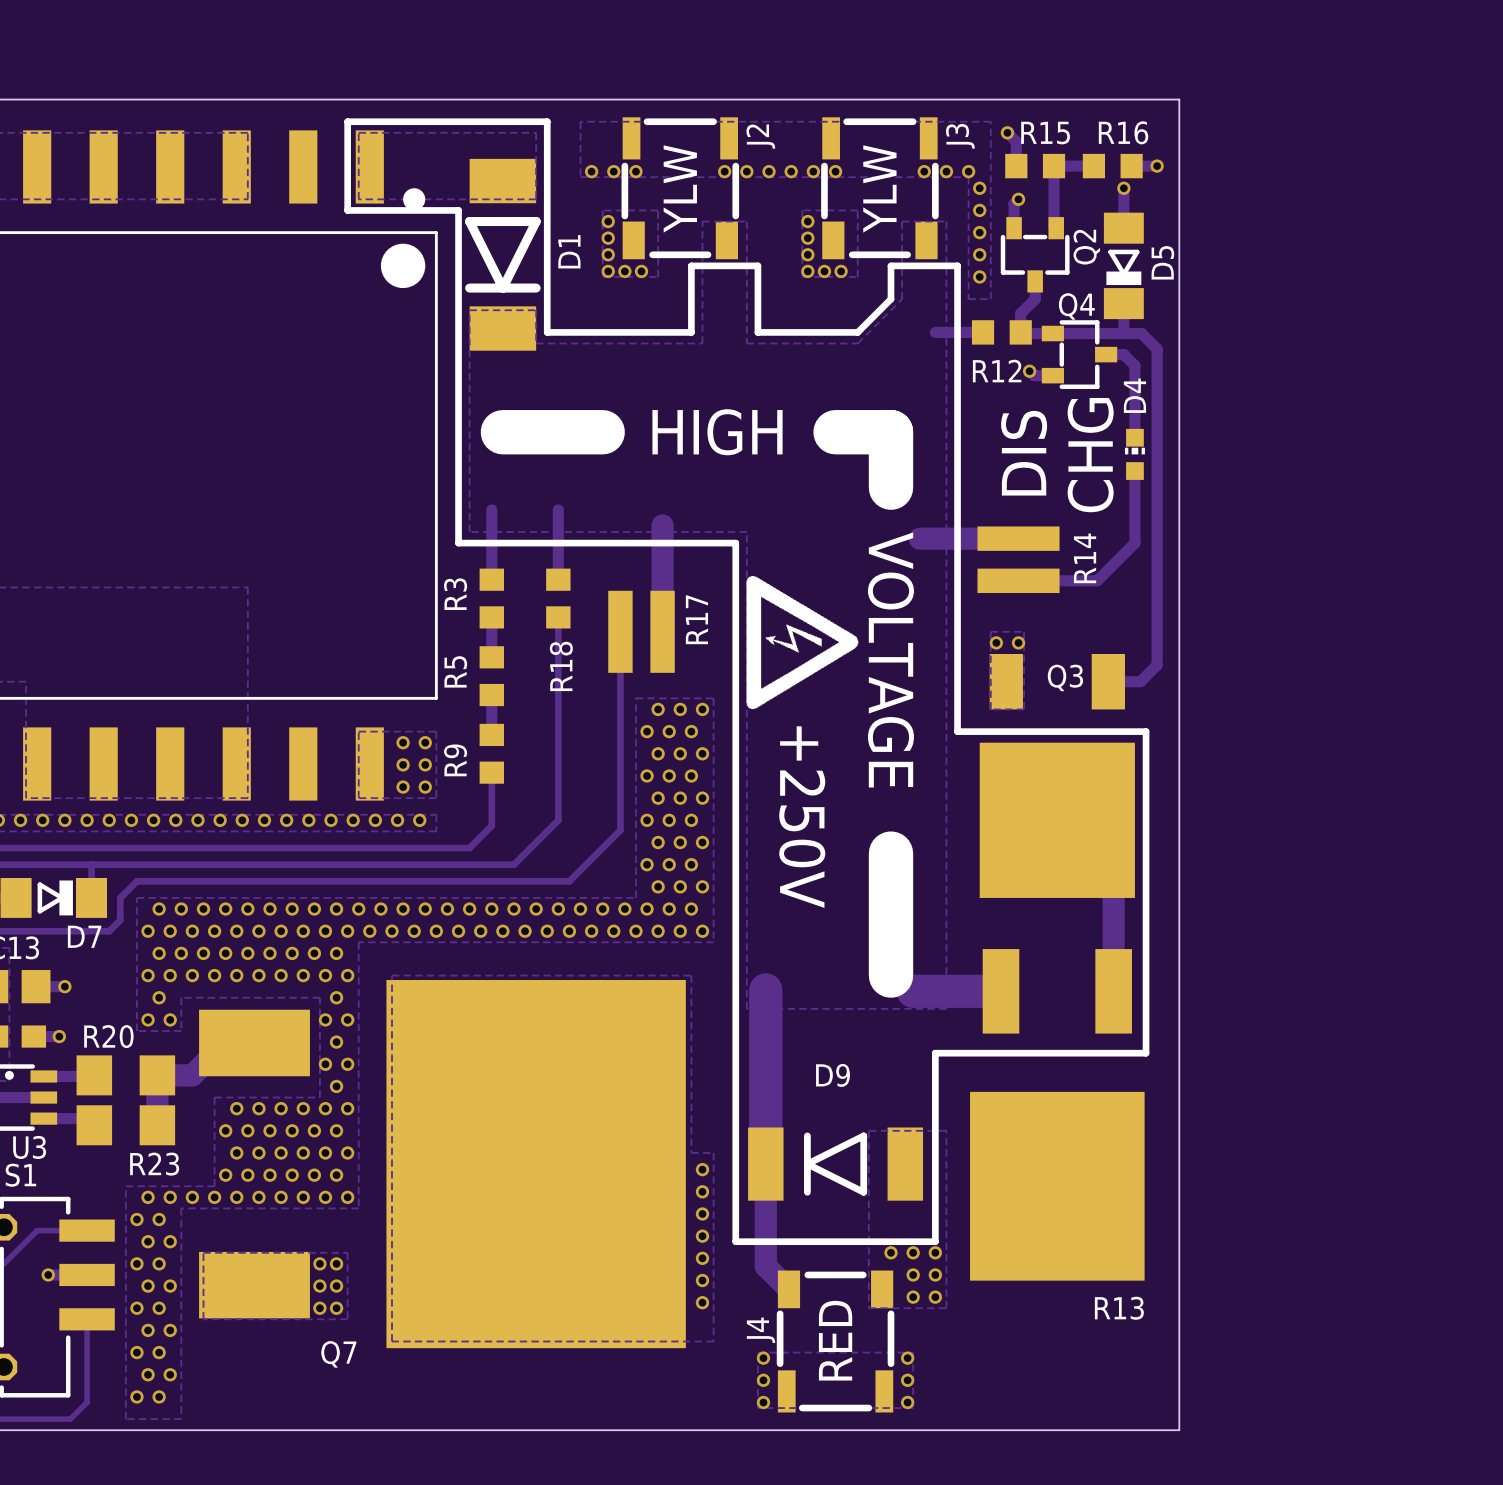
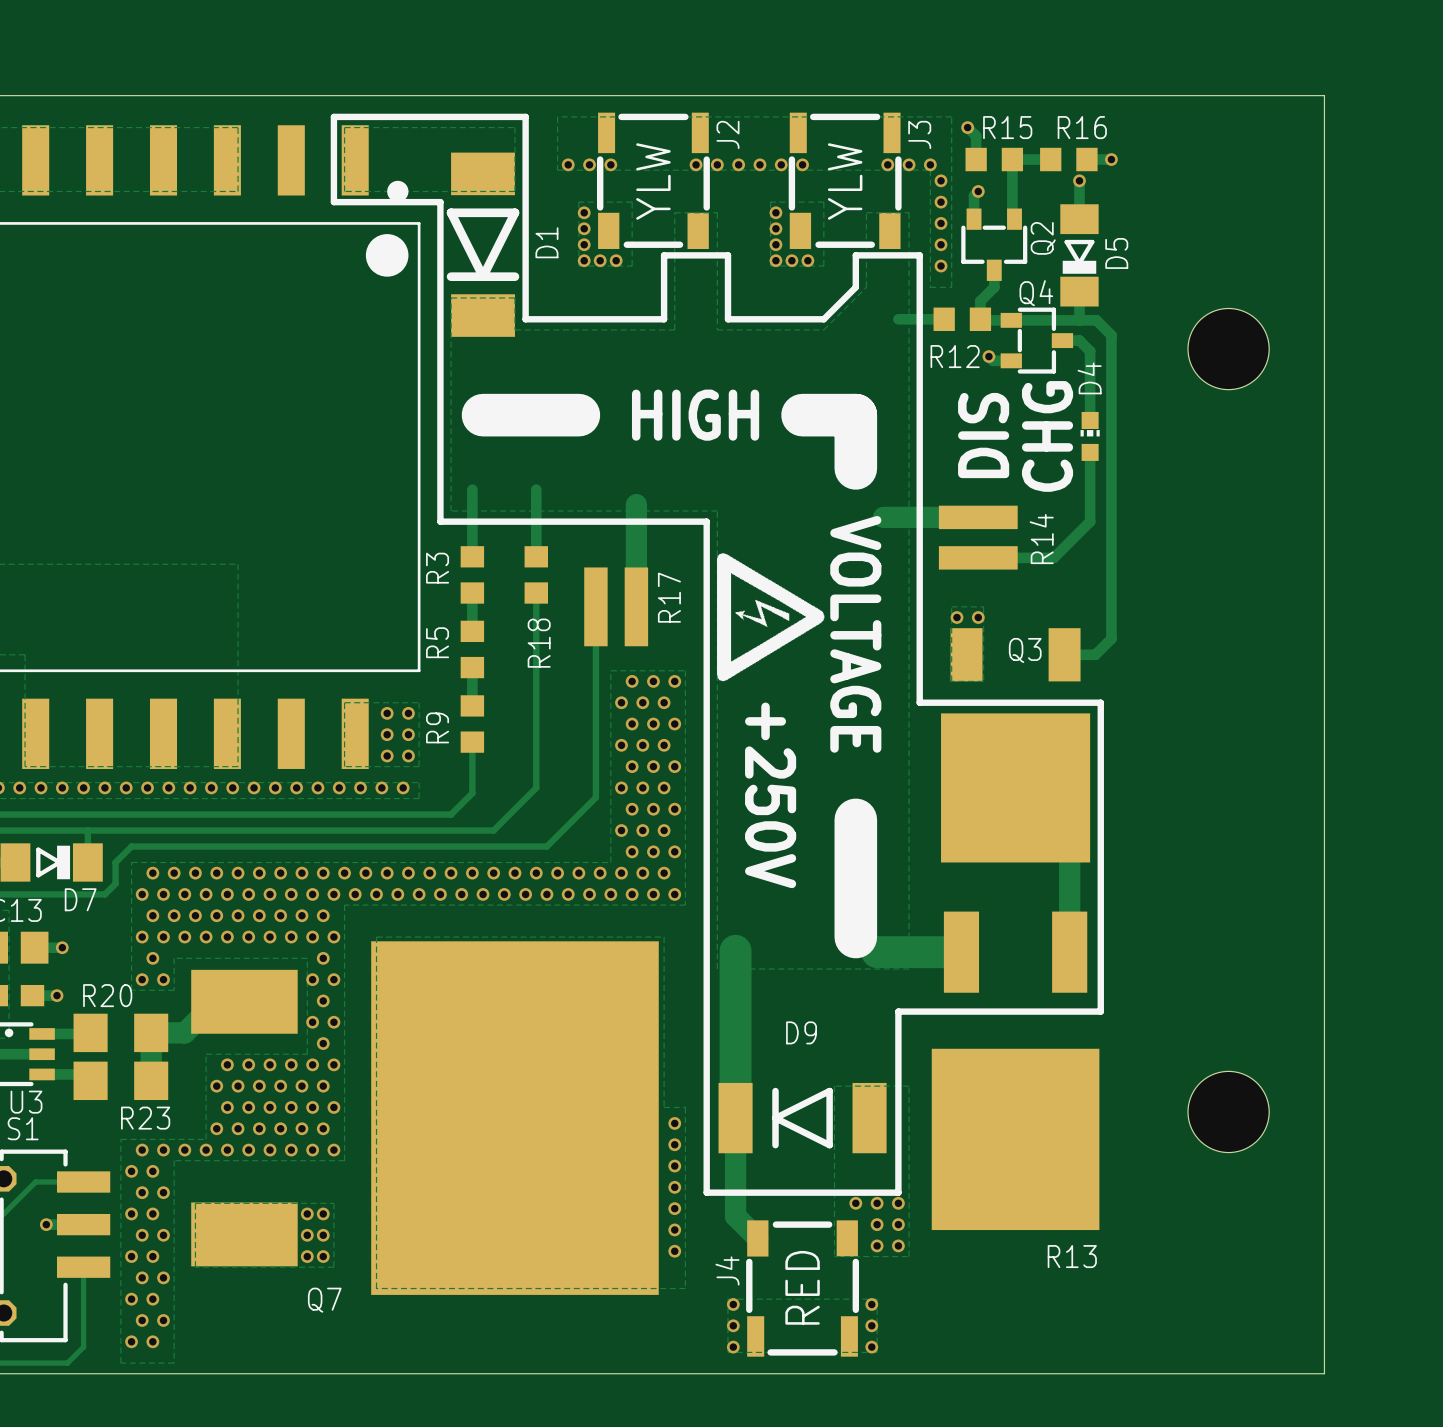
board edge: (1179, 99) (1179, 1430) -> (1132, 95) (1324, 95) (1324, 1373) (1132, 1373)
hole: none -> (1228, 349)
hole: none -> (1228, 1111)

